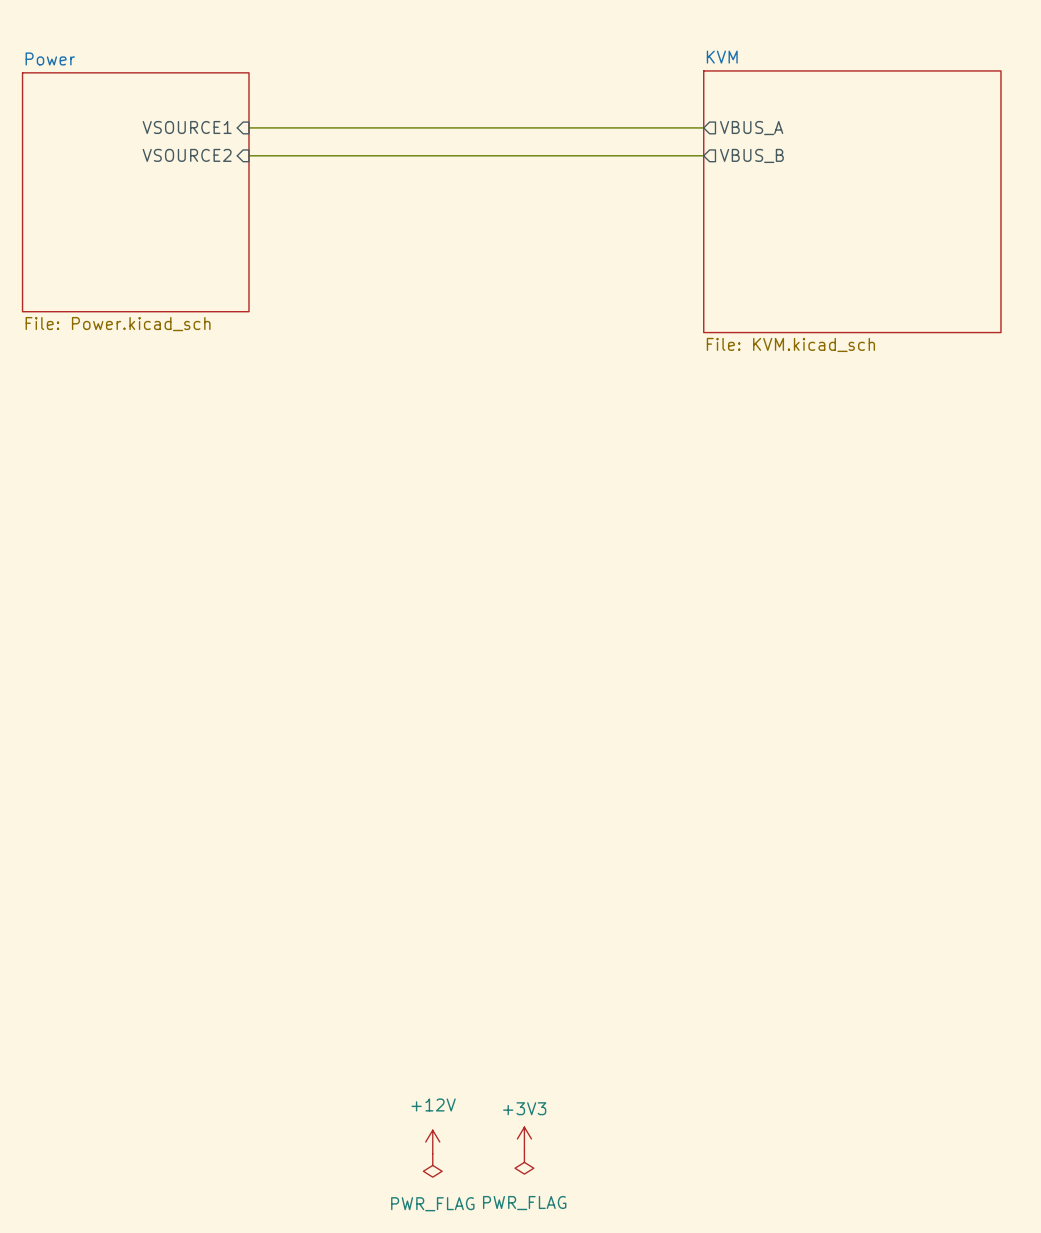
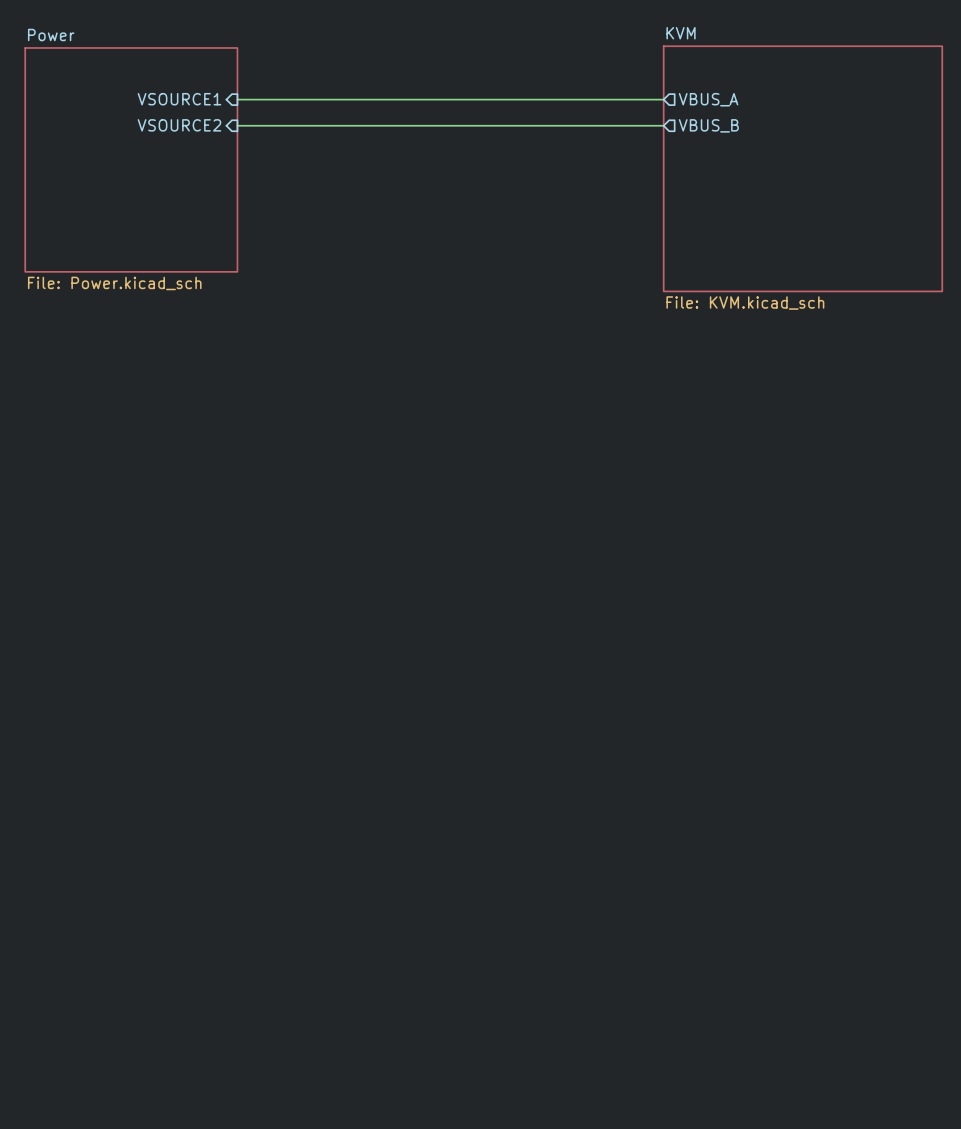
power symbol: +3V3 (524, 1138) -> none
power symbol: +12V (432, 1141) -> none
power symbol: PWR_FLAG (524, 1162) -> none
power symbol: PWR_FLAG (432, 1165) -> none

